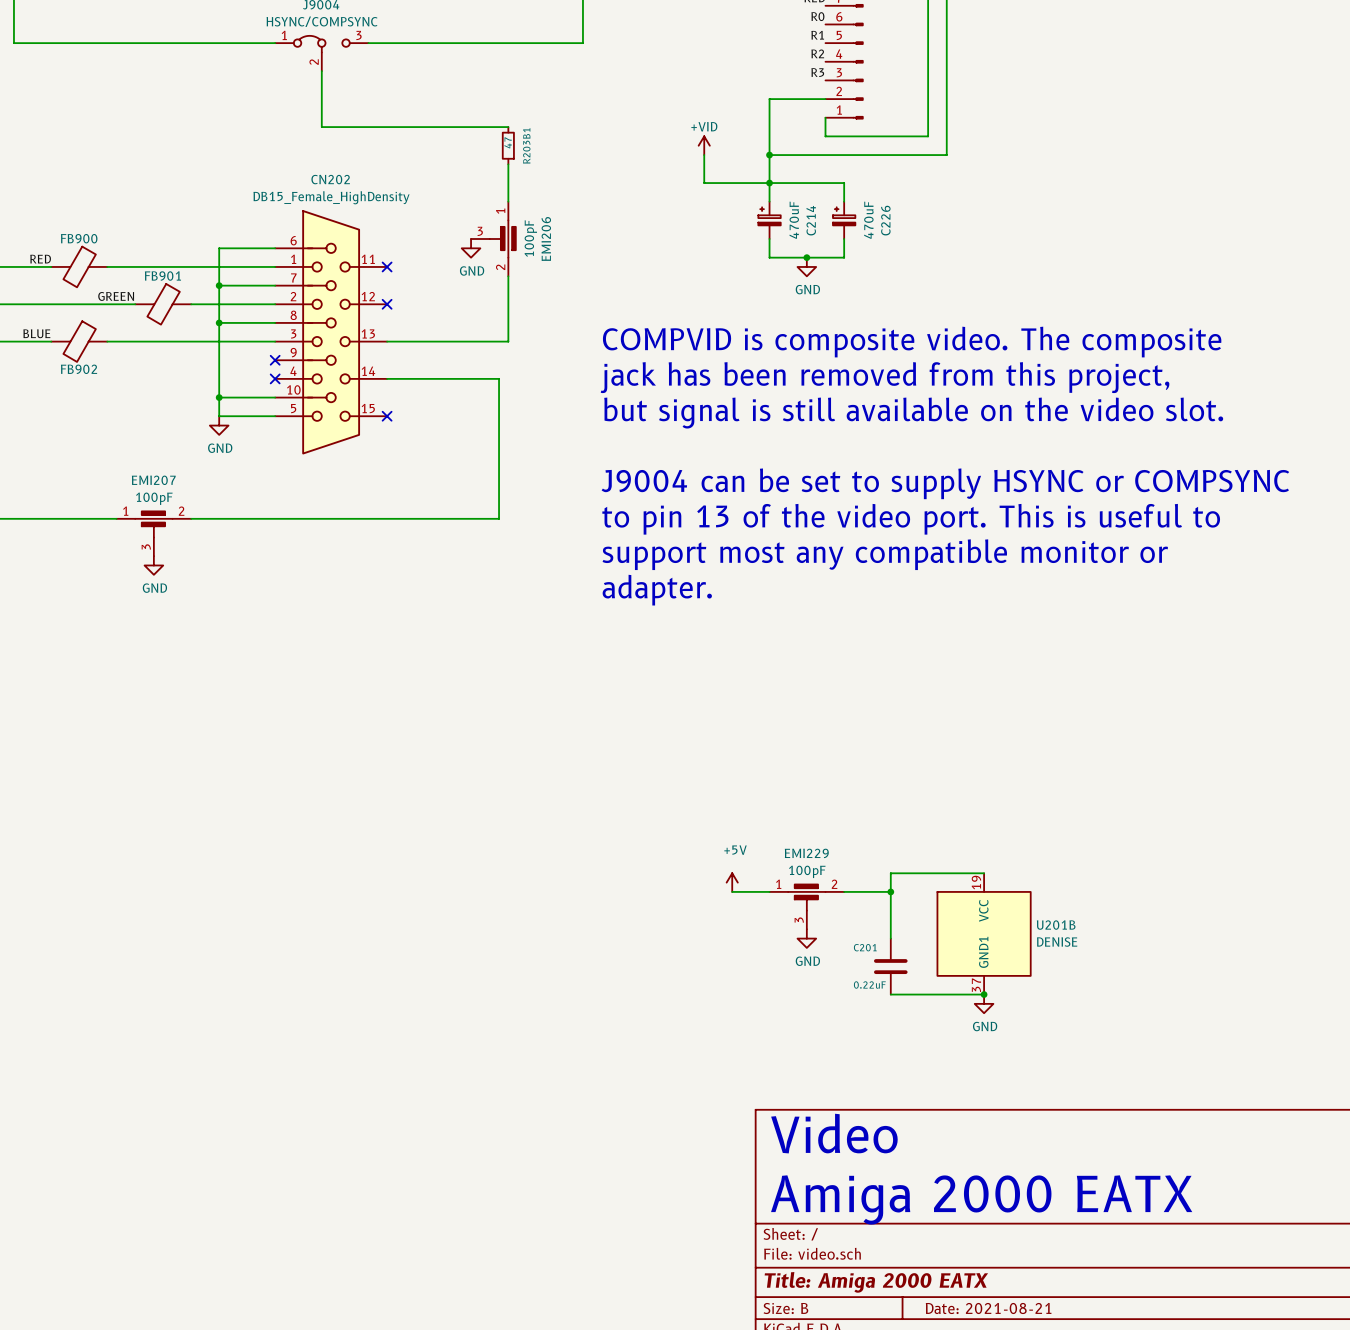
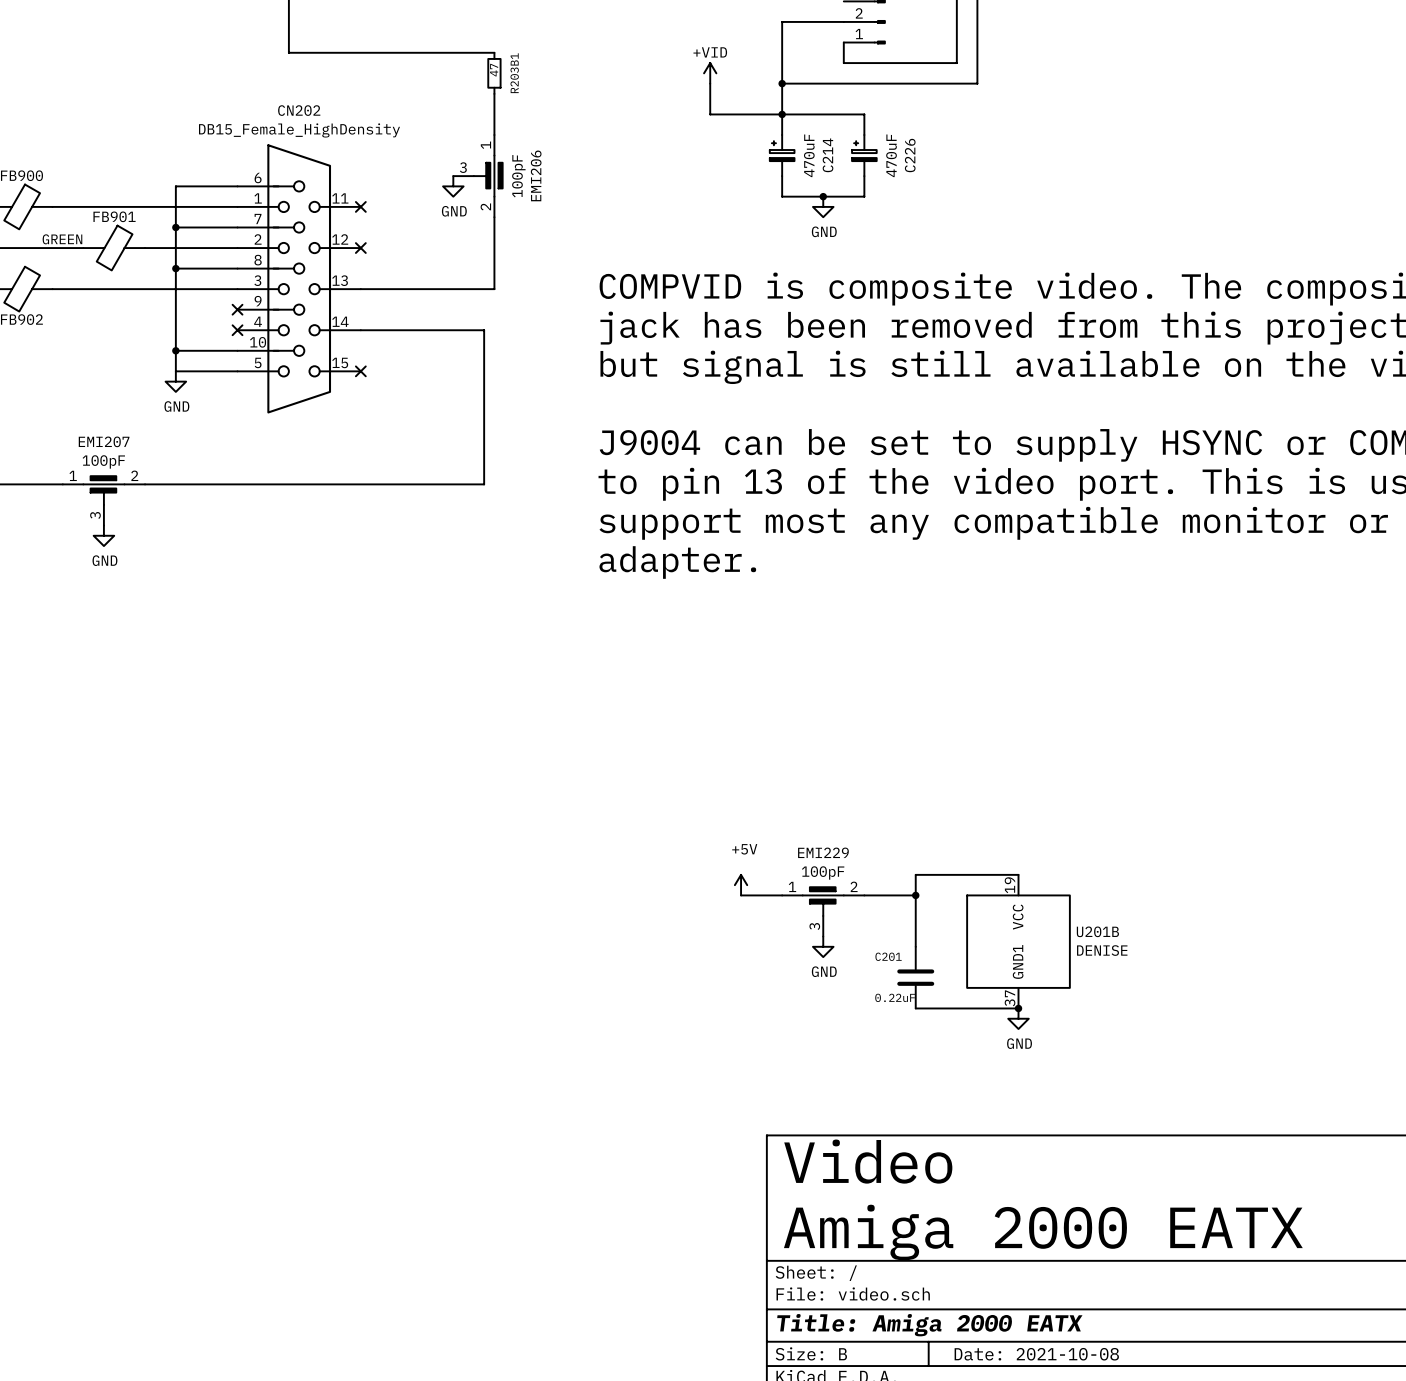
title block: Date: 2021-08-21 (988, 1308) -> Date: 2021-10-08 (1036, 1354)

